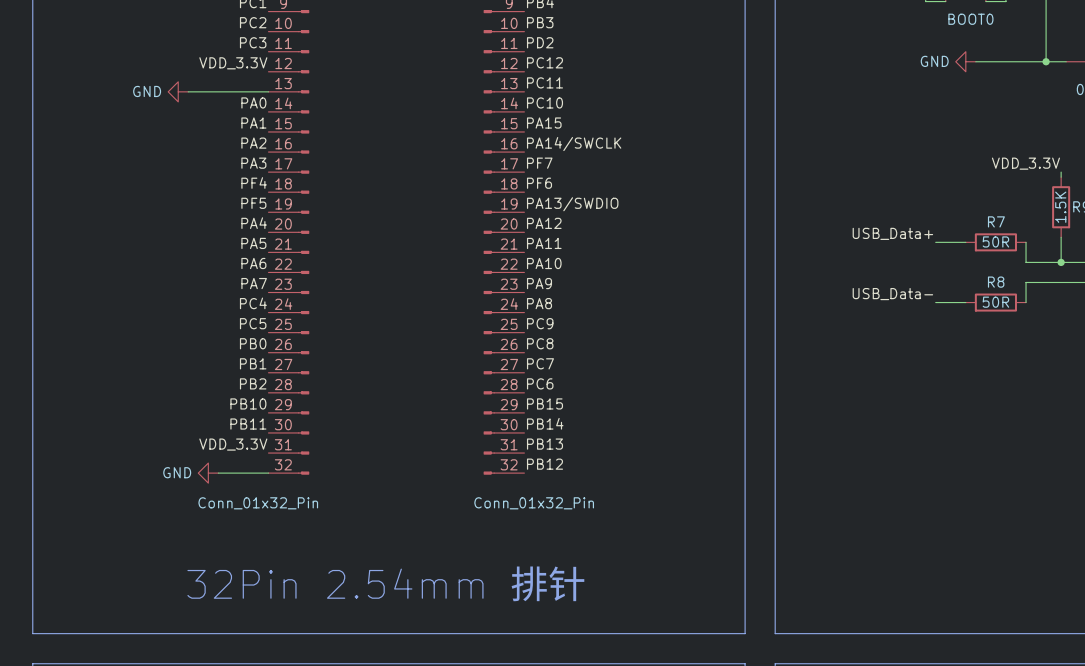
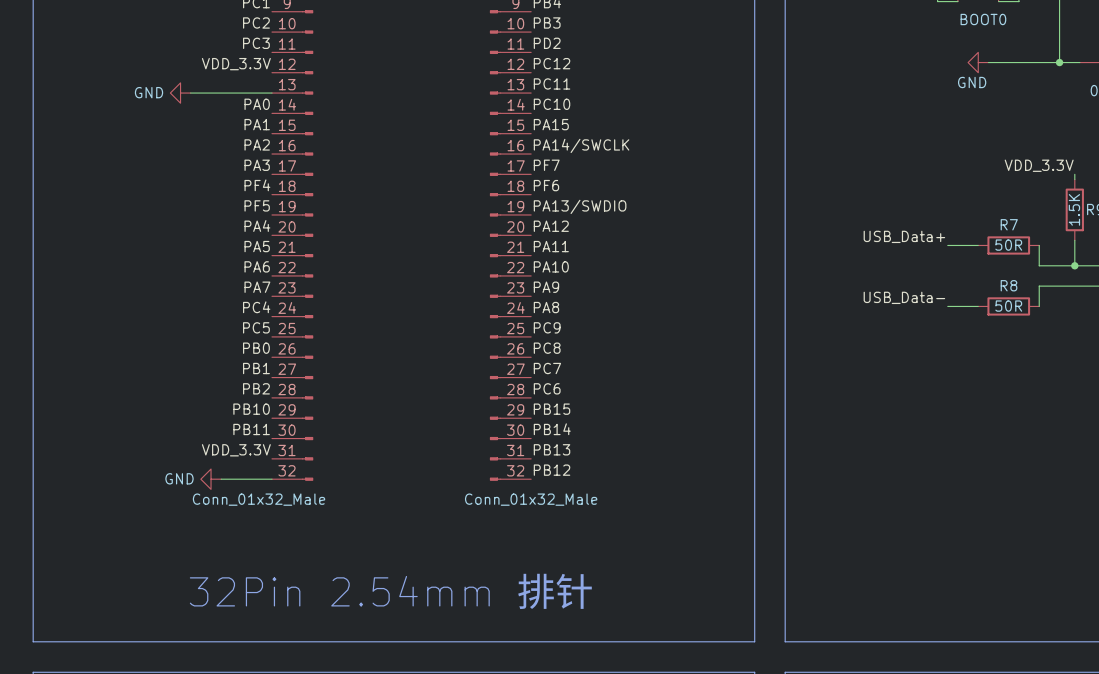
power symbol text position: GND (934, 61) -> GND (972, 82)
part value: Conn_01x32_Pin (258, 503) -> Conn_01x32_Male (259, 499)
part value: Conn_01x32_Pin (534, 503) -> Conn_01x32_Male (531, 499)

